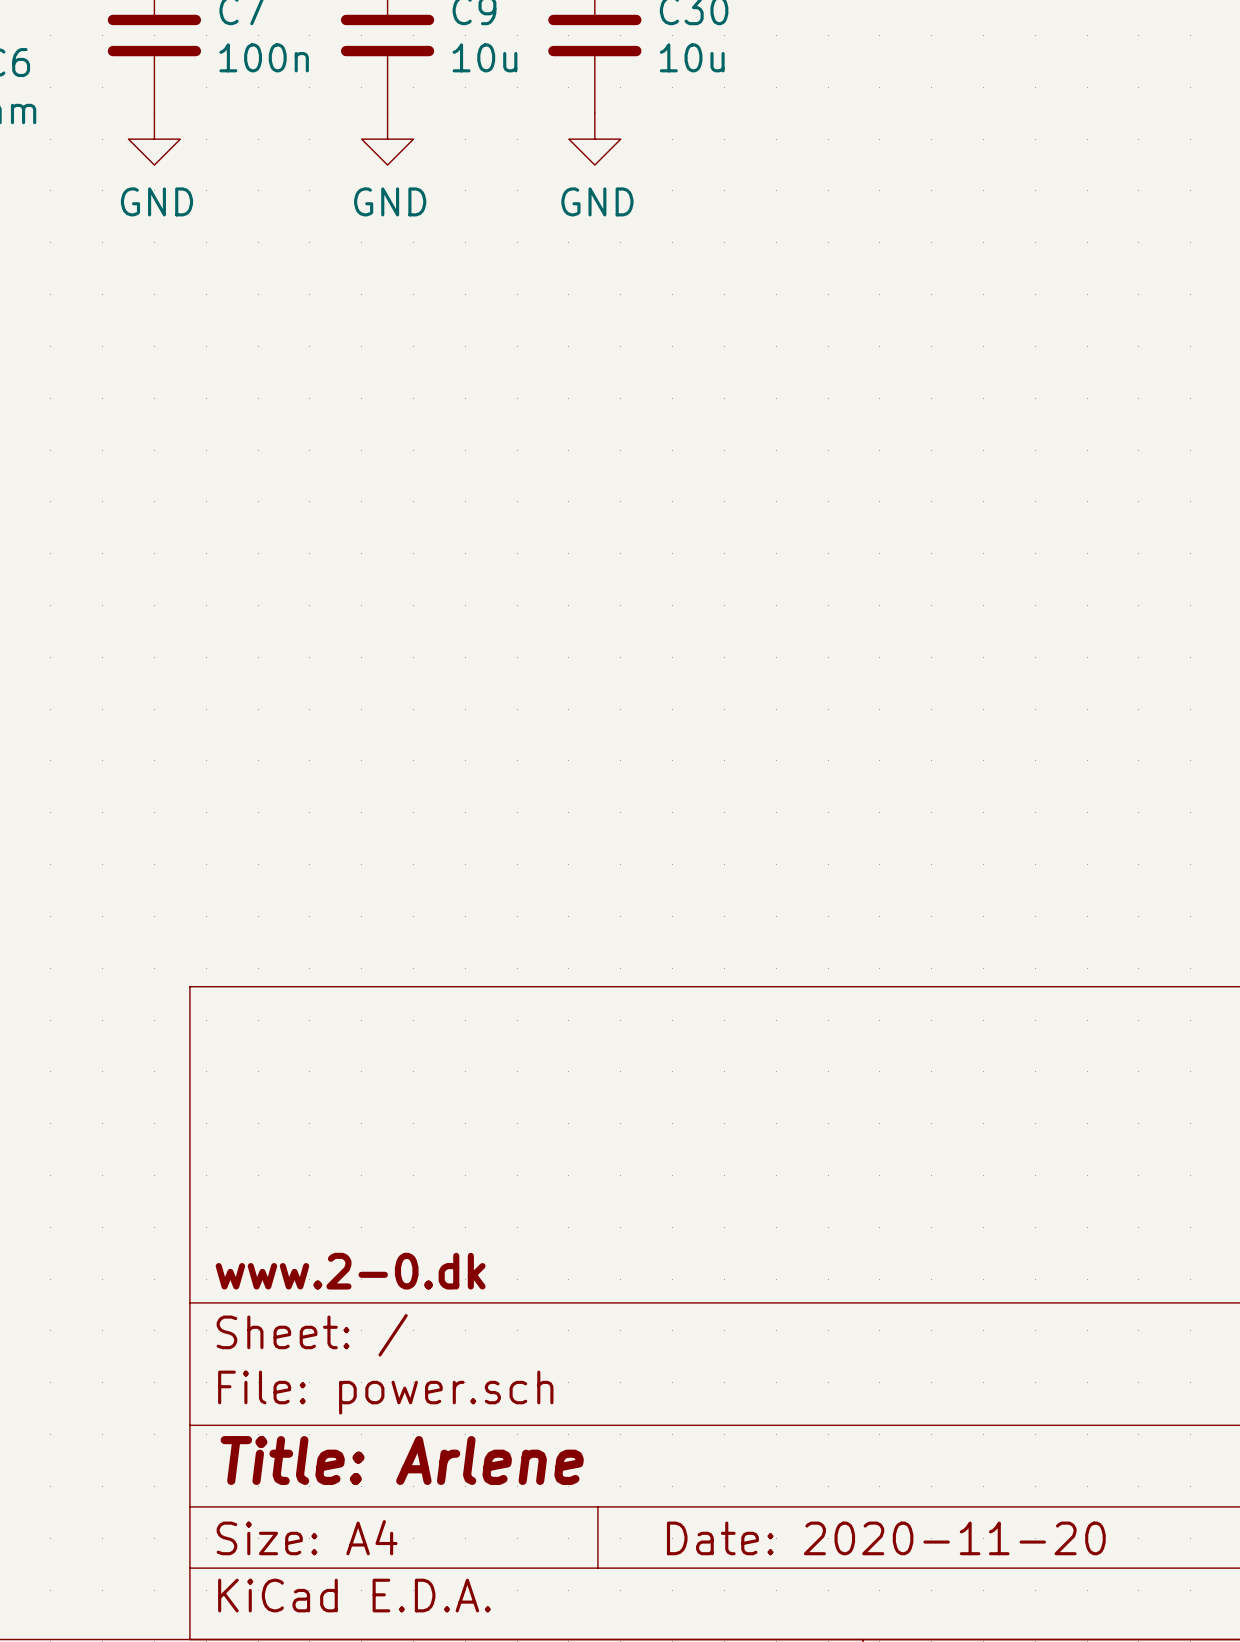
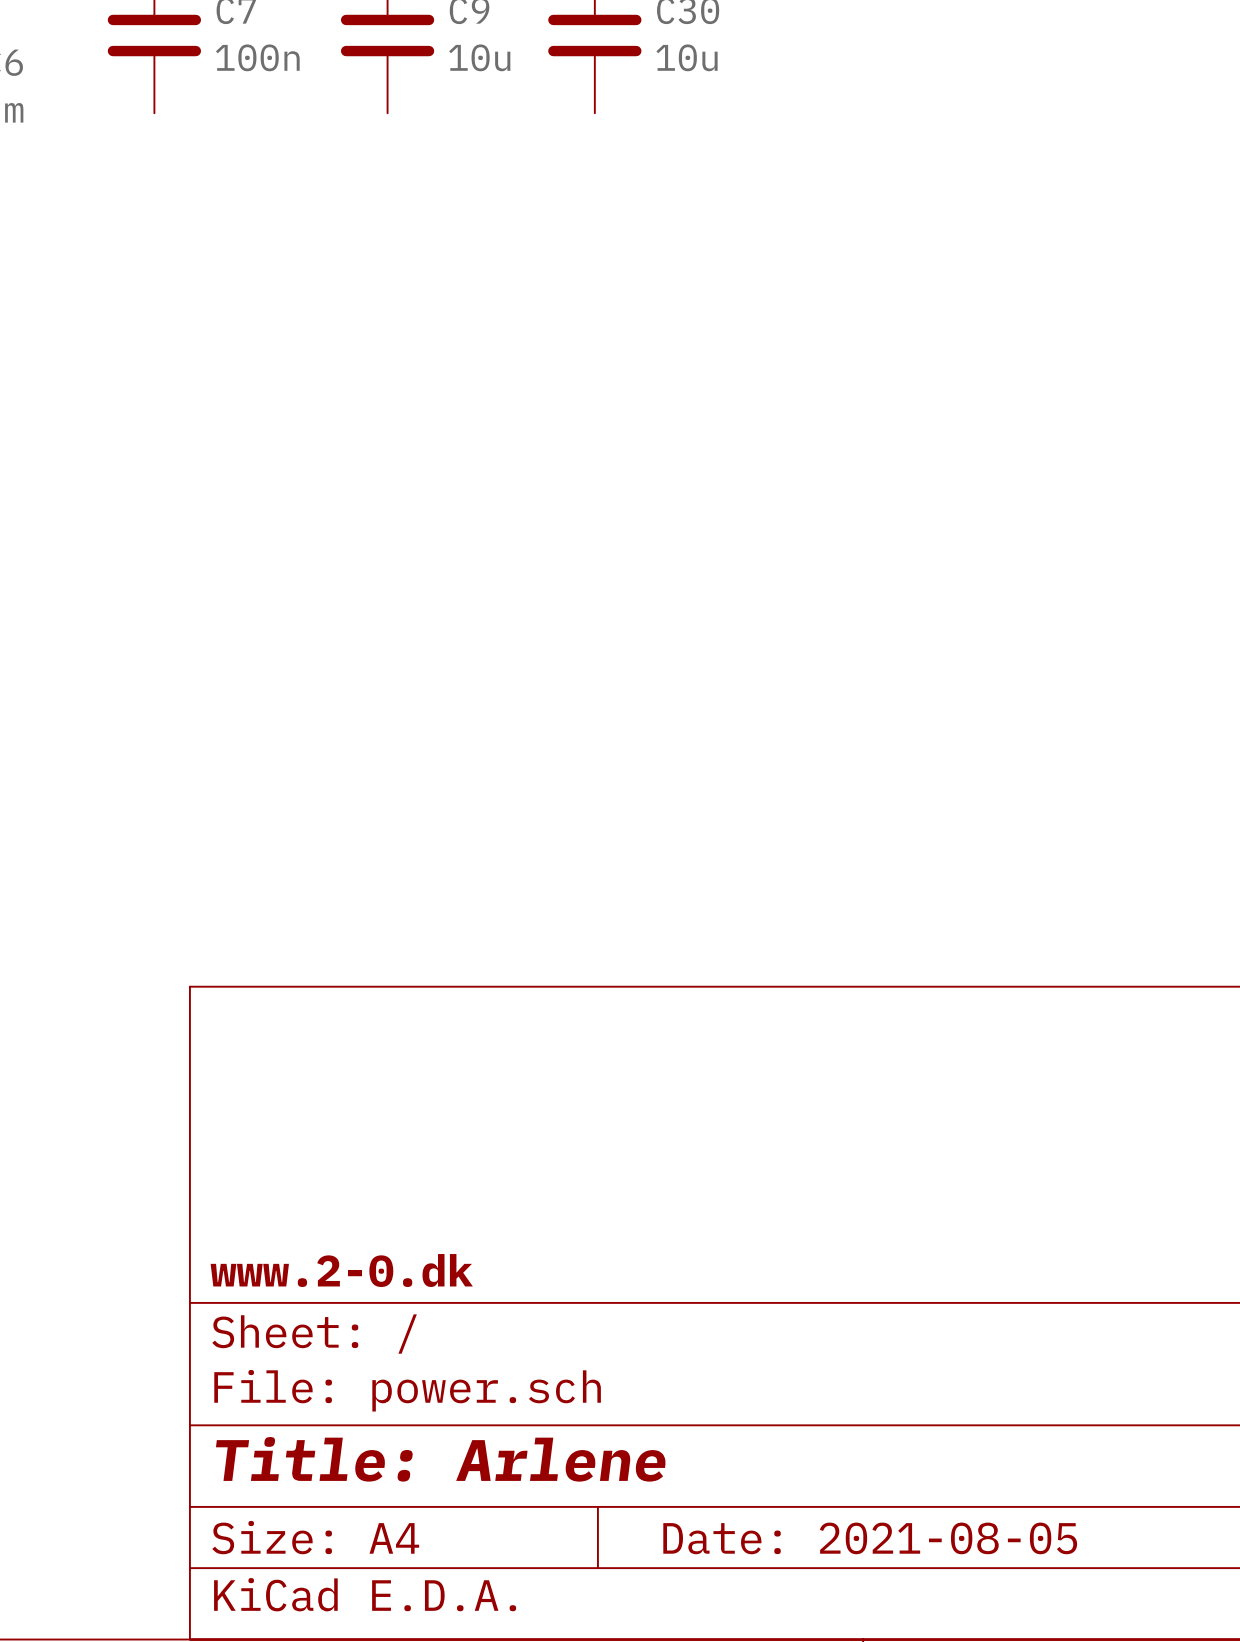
power symbol: GND (154, 139) -> none
power symbol: GND (387, 139) -> none
power symbol: GND (594, 139) -> none
title block: Date: 2020-11-20 (886, 1538) -> Date: 2021-08-05 (870, 1538)

